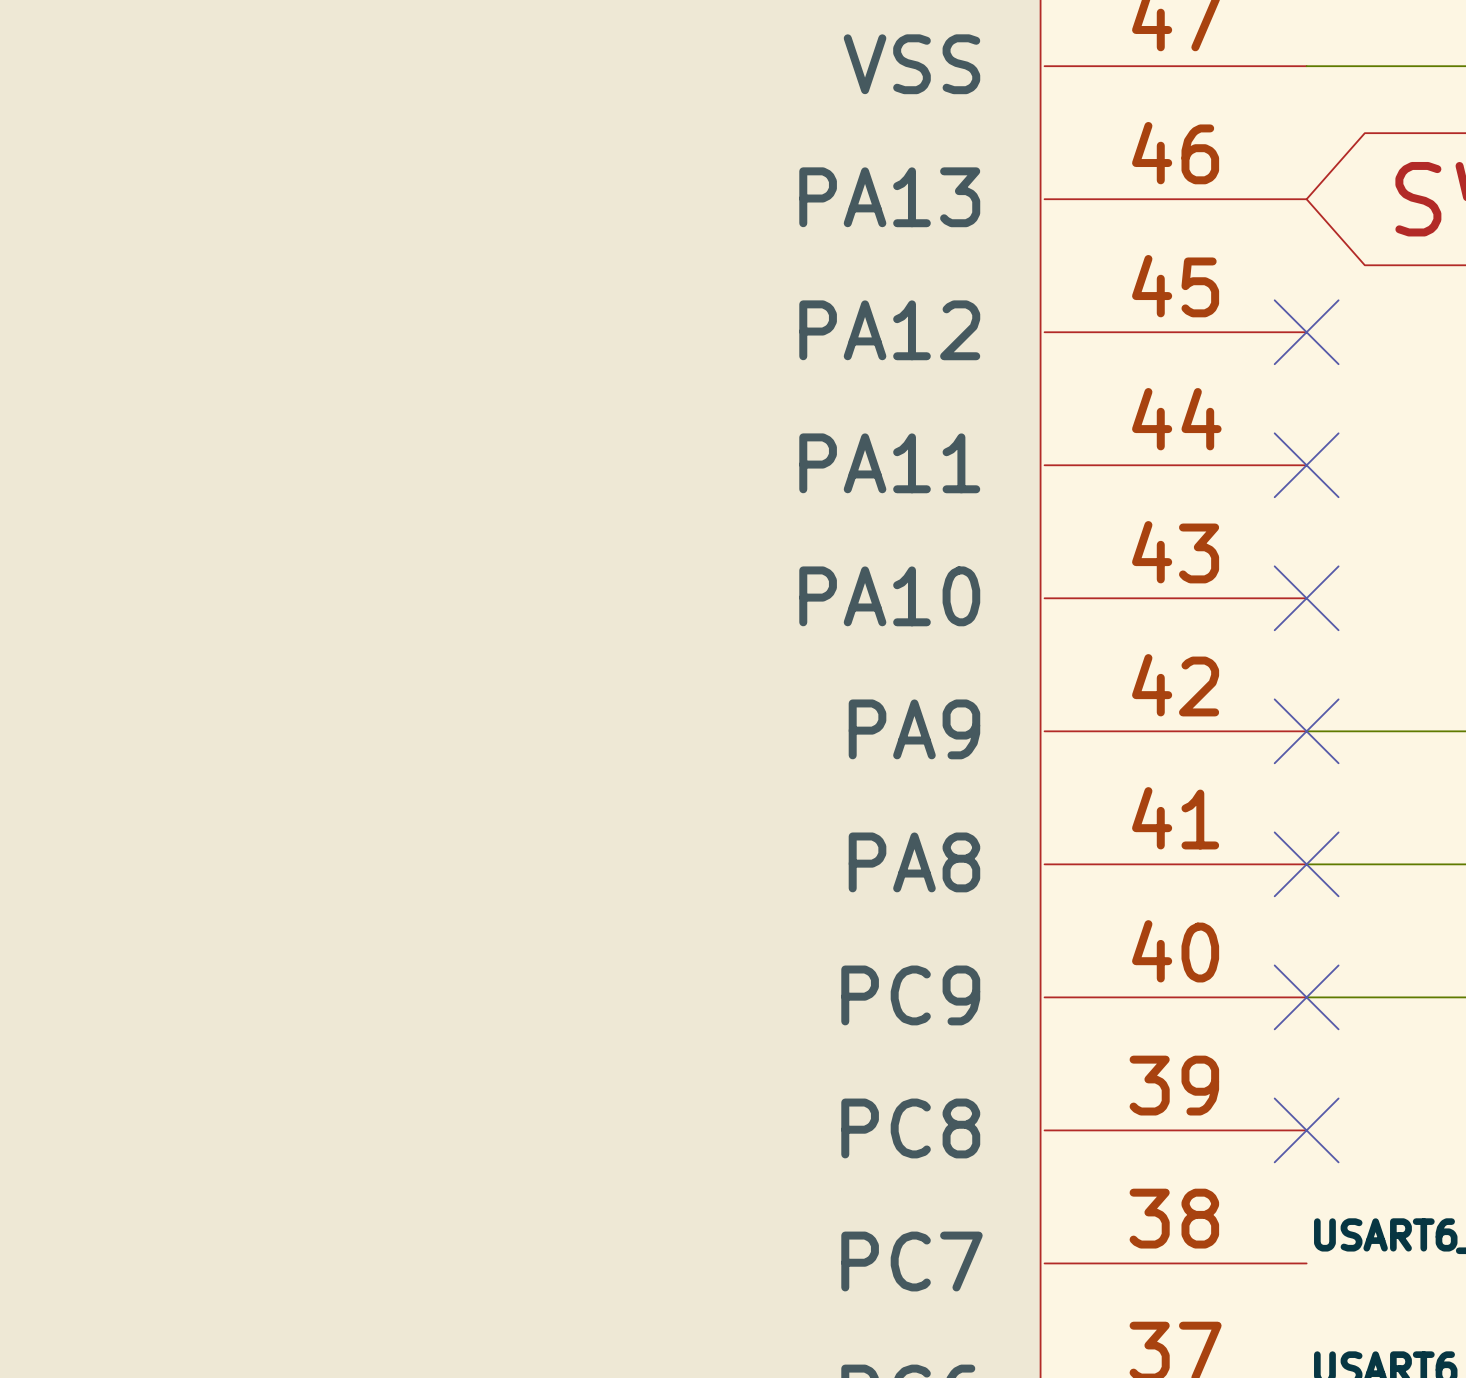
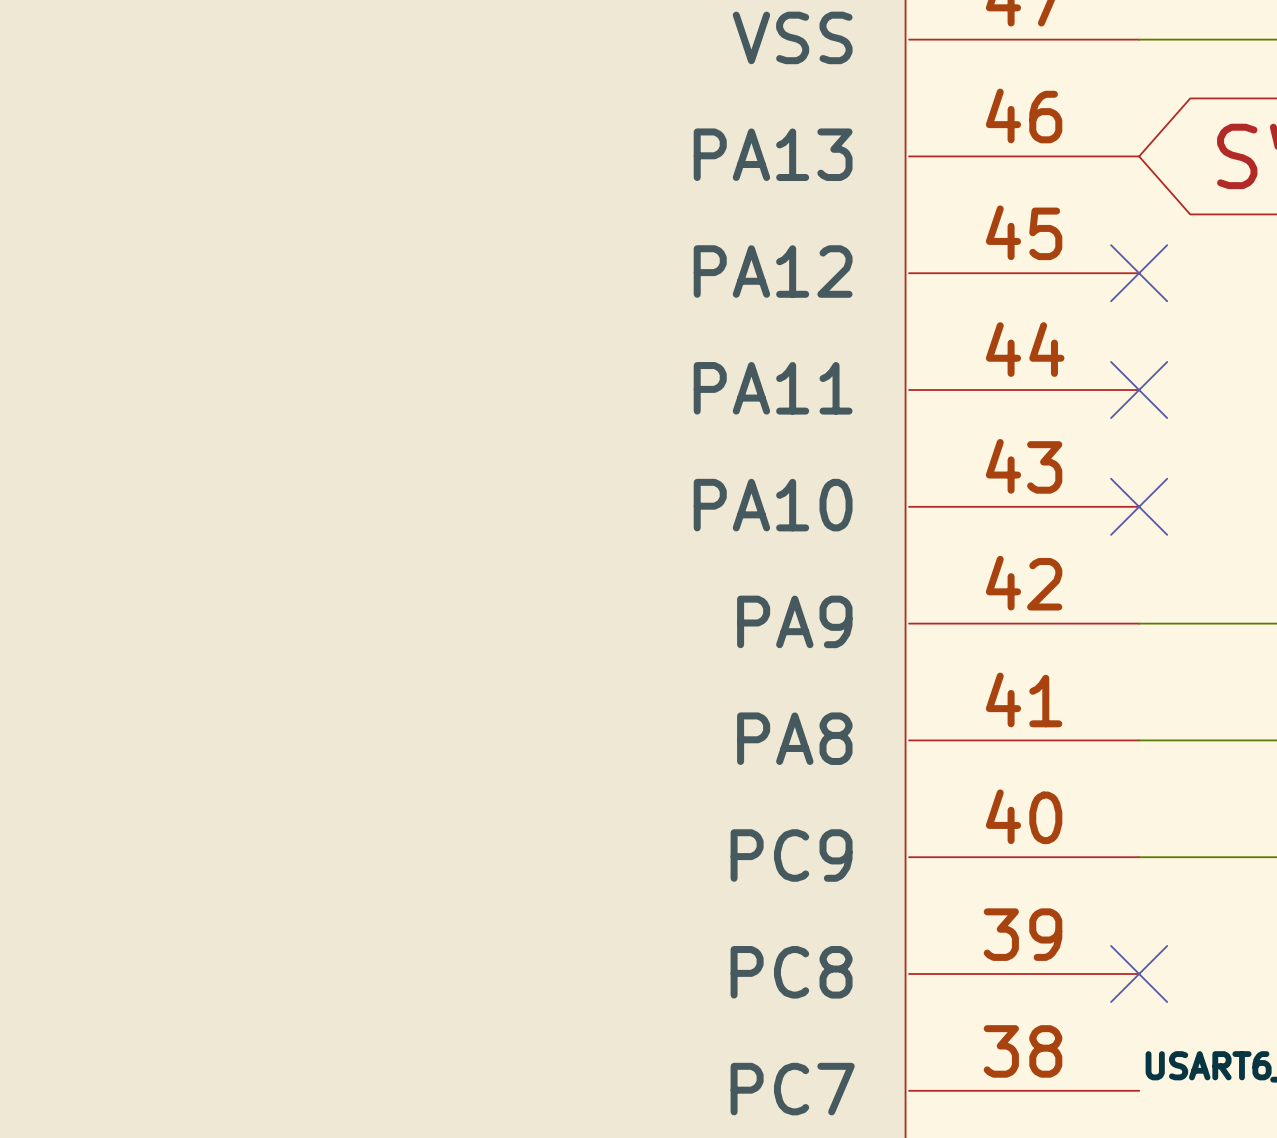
no-connect mark: (1306, 731) -> none
no-connect mark: (1306, 864) -> none
no-connect mark: (1306, 997) -> none

